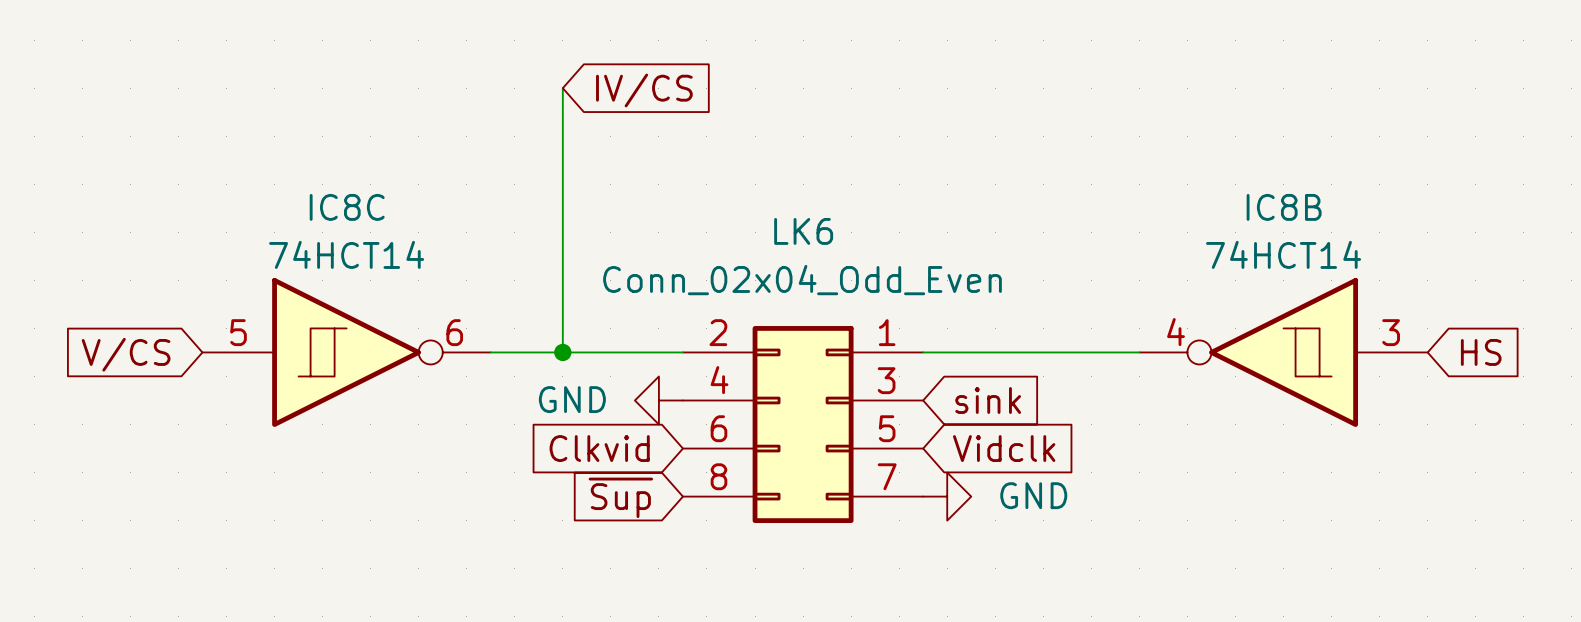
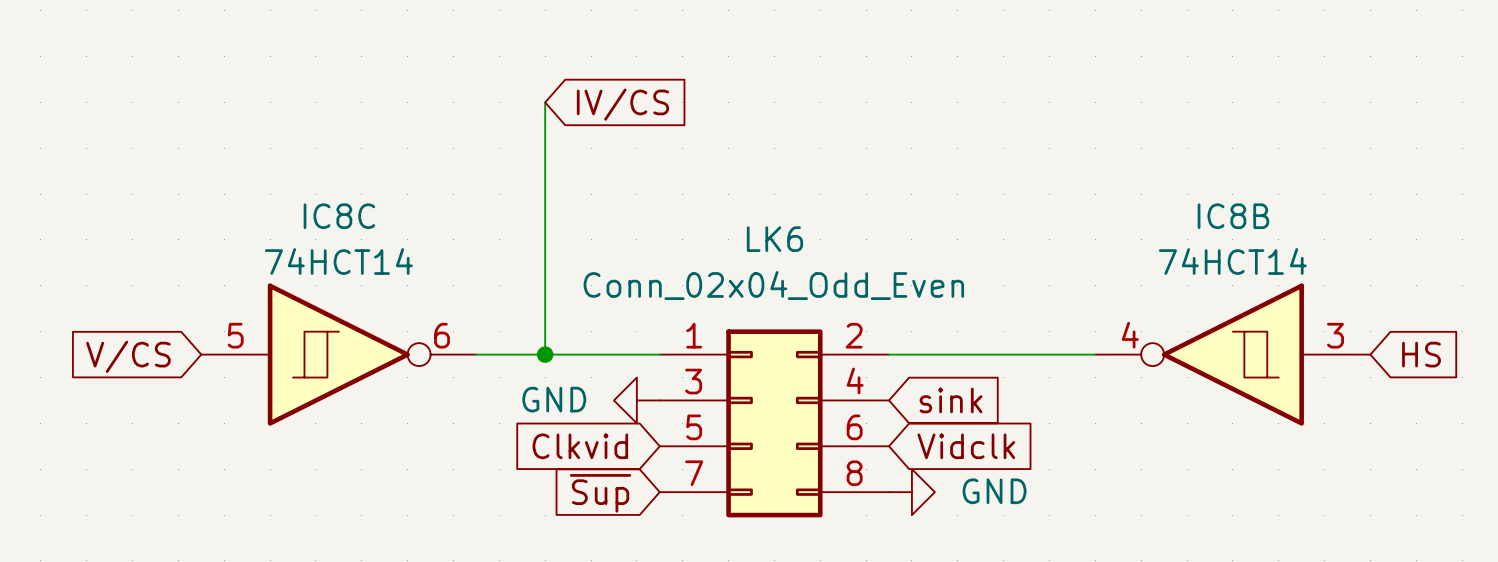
LK6 flip: as is (803, 424) -> left-right (774, 423)

